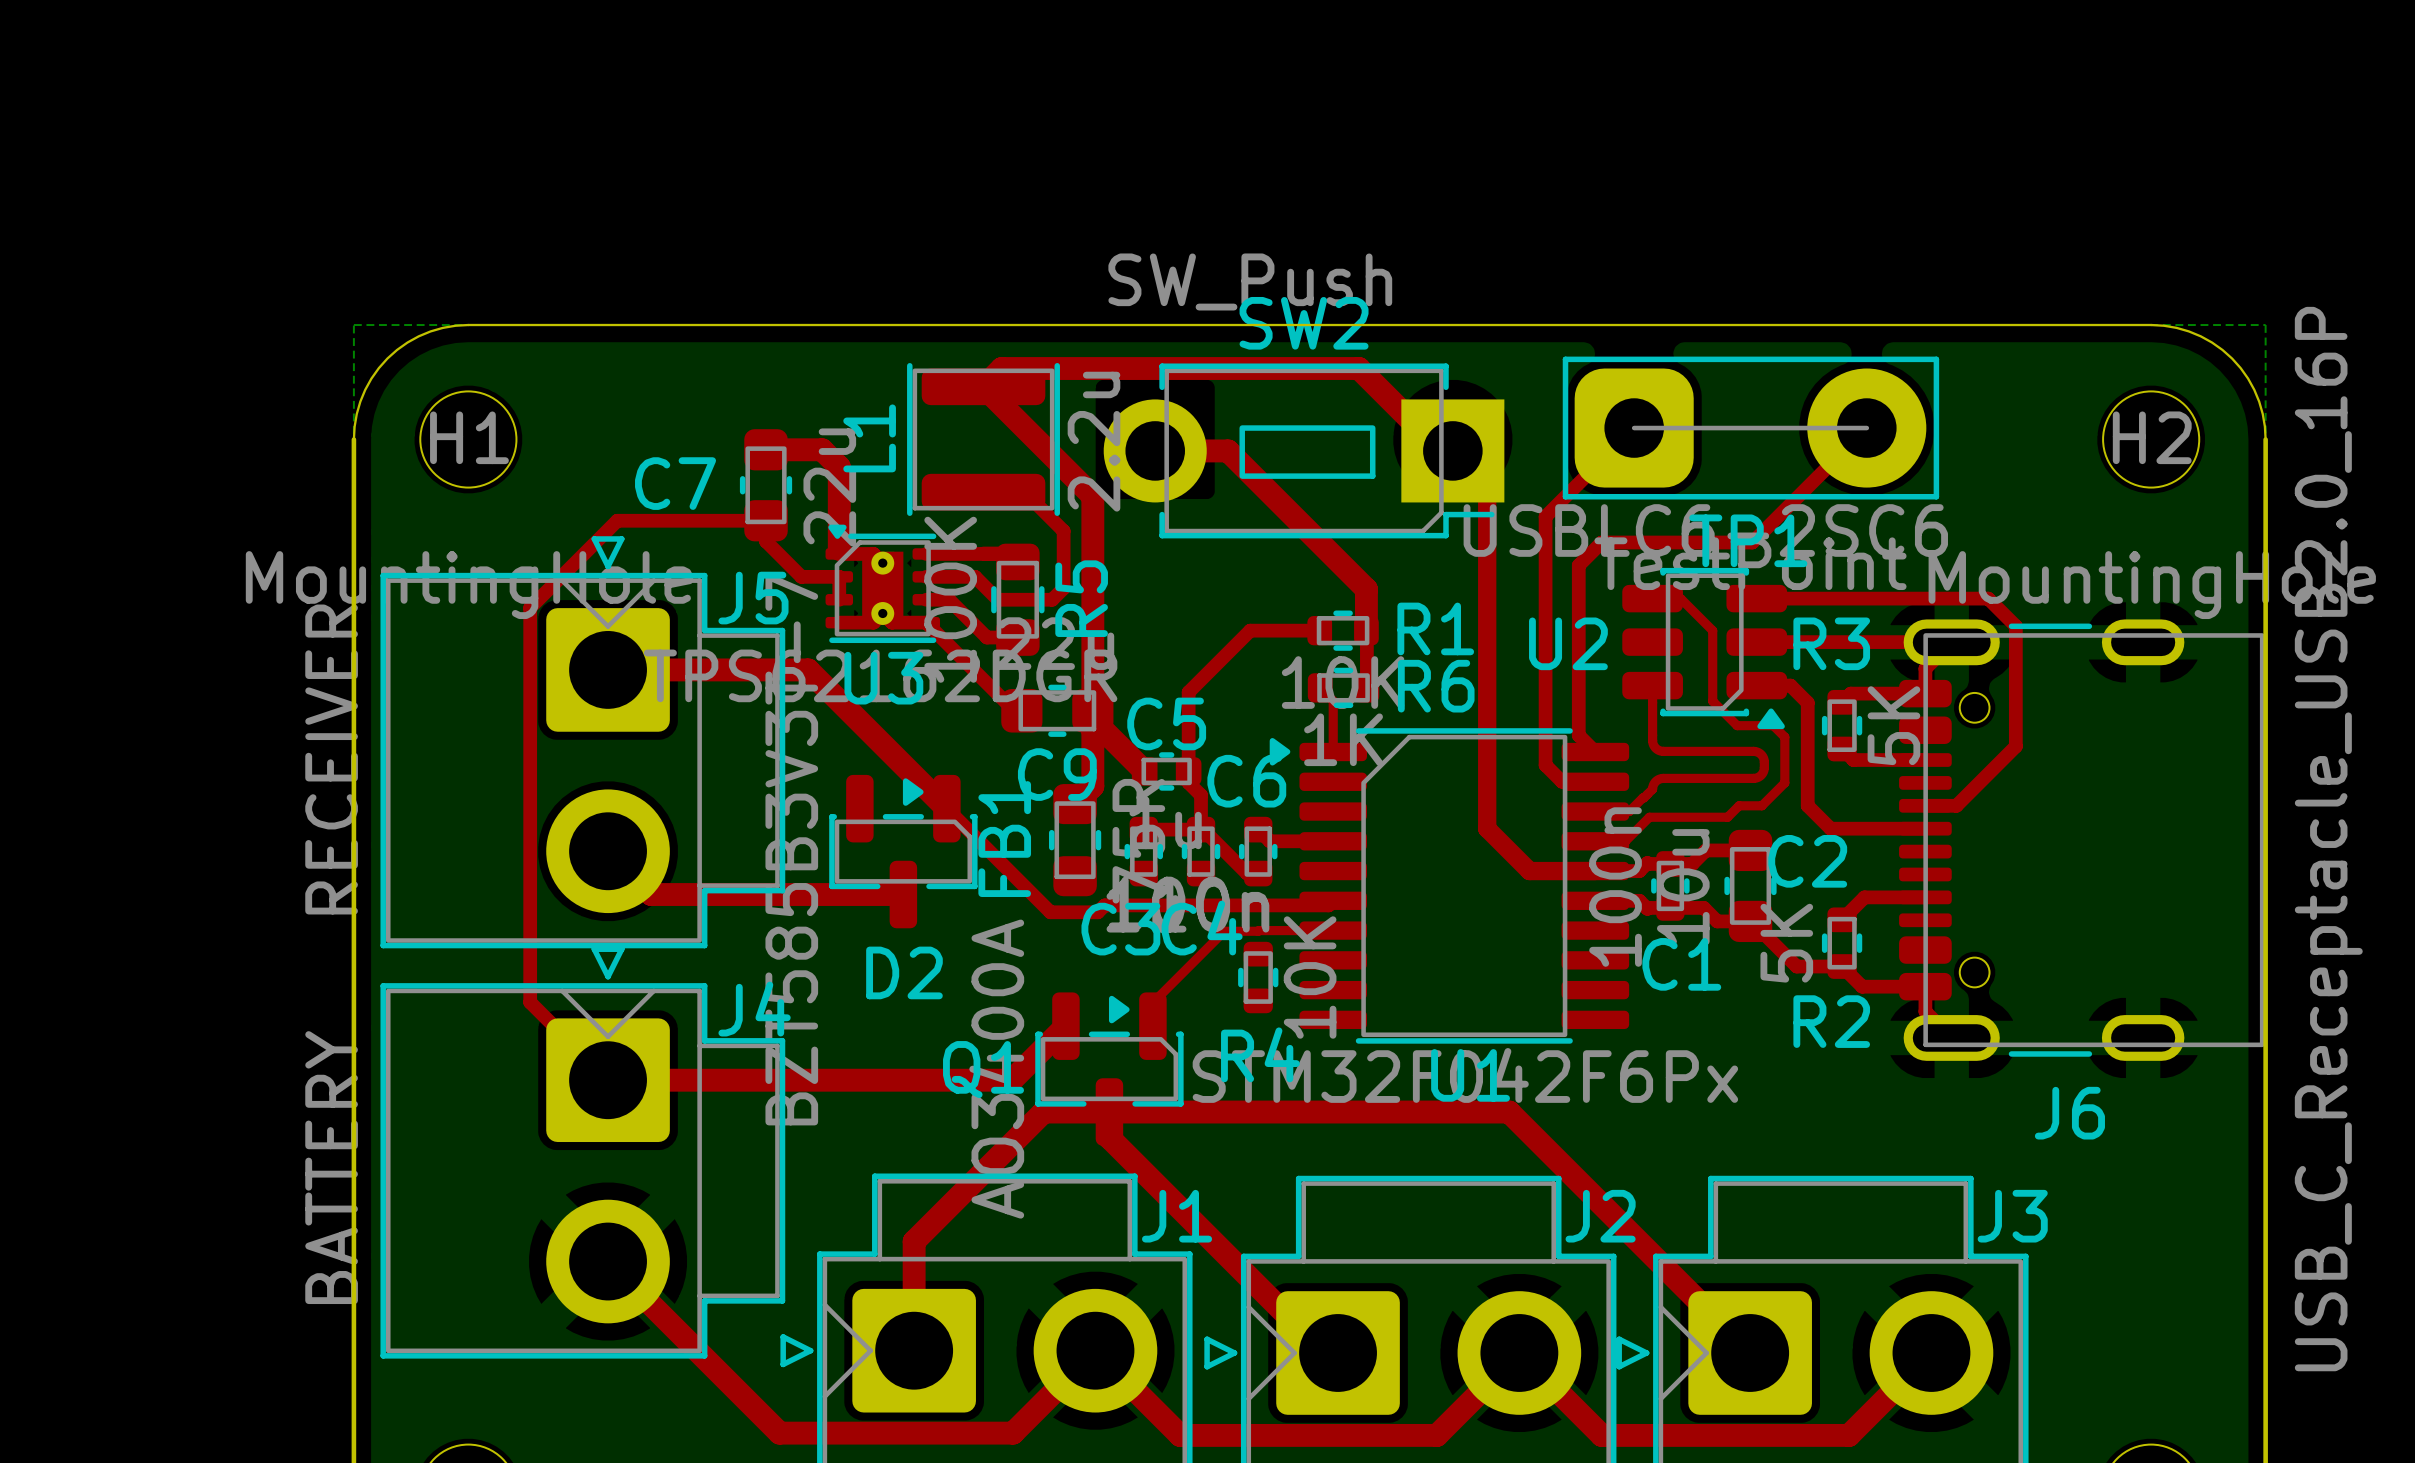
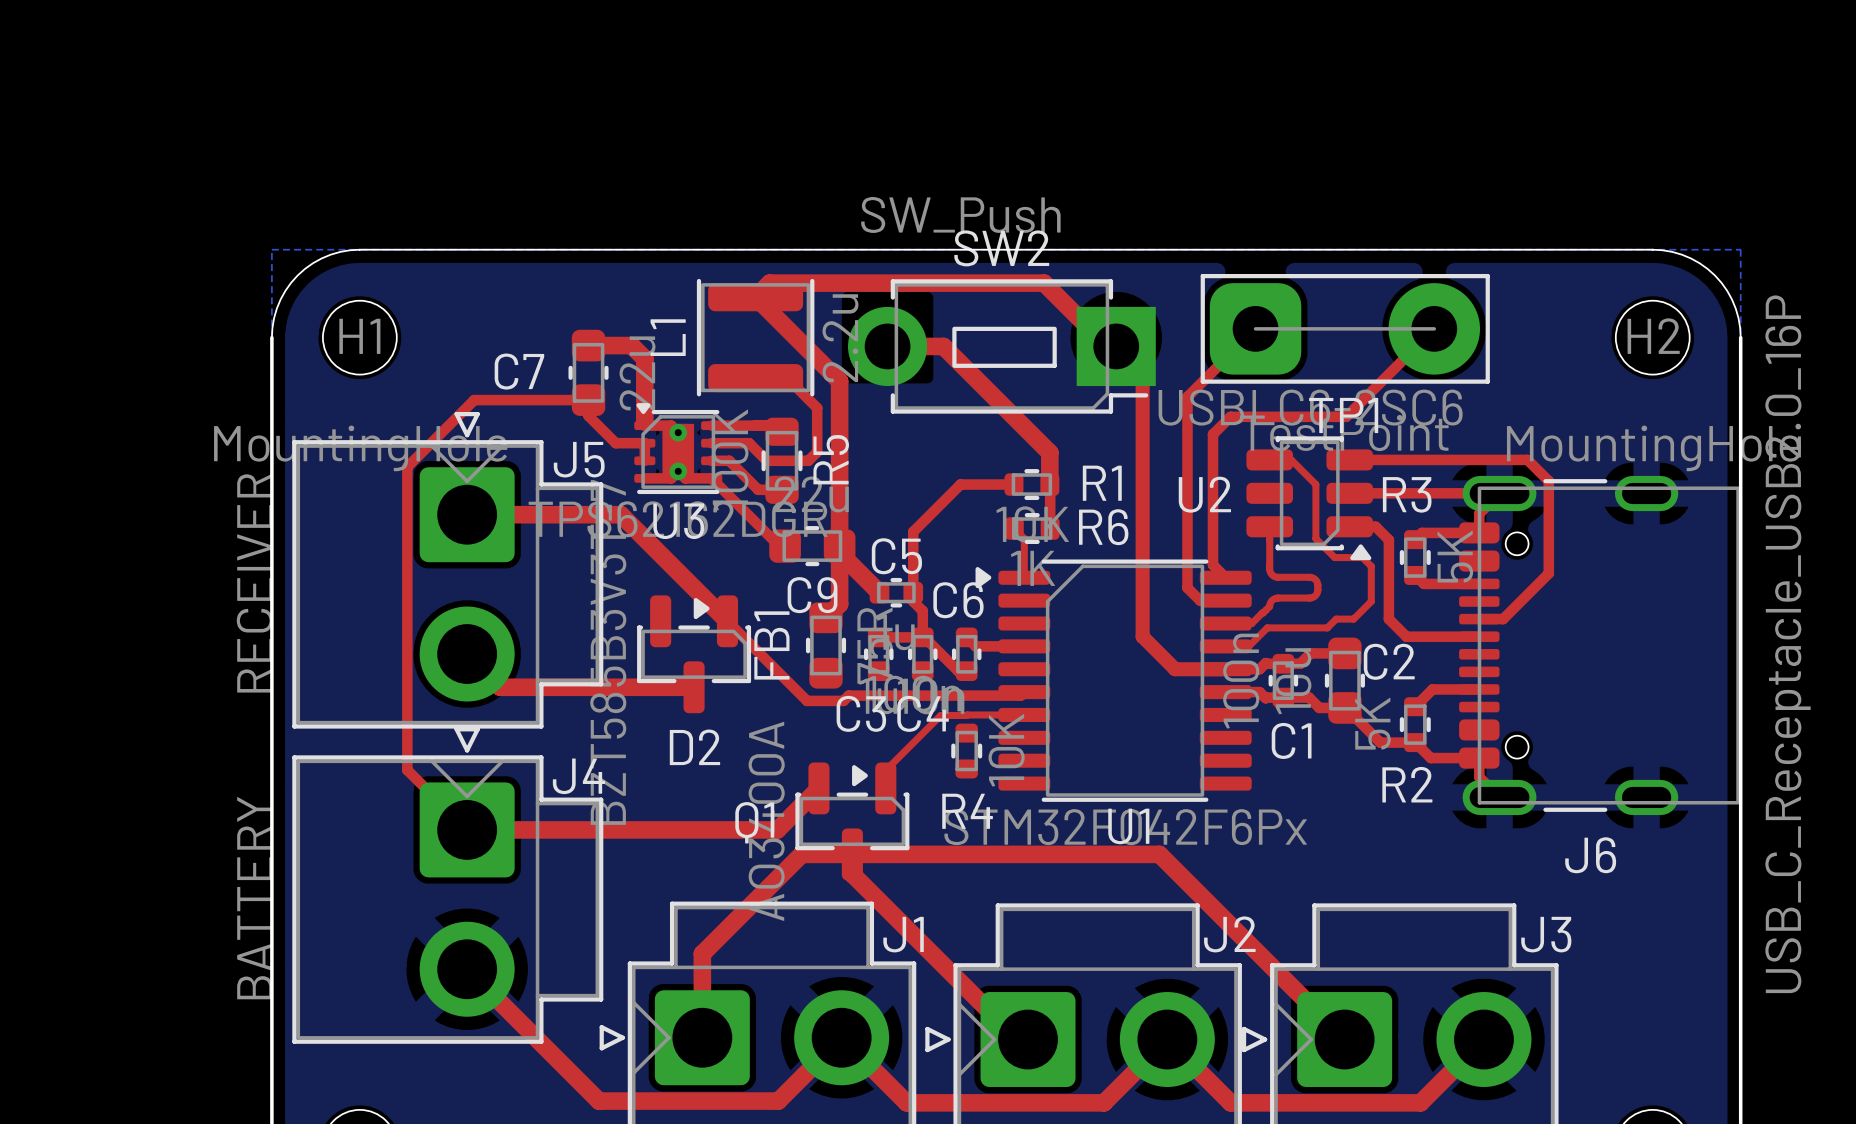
top track: (1704, 751) (1754, 751) (1762, 755) (1764, 762) (1762, 773) (1756, 778) (1704, 778) -> (1309, 577) (1315, 579) (1317, 585) (1316, 593) (1309, 598)

